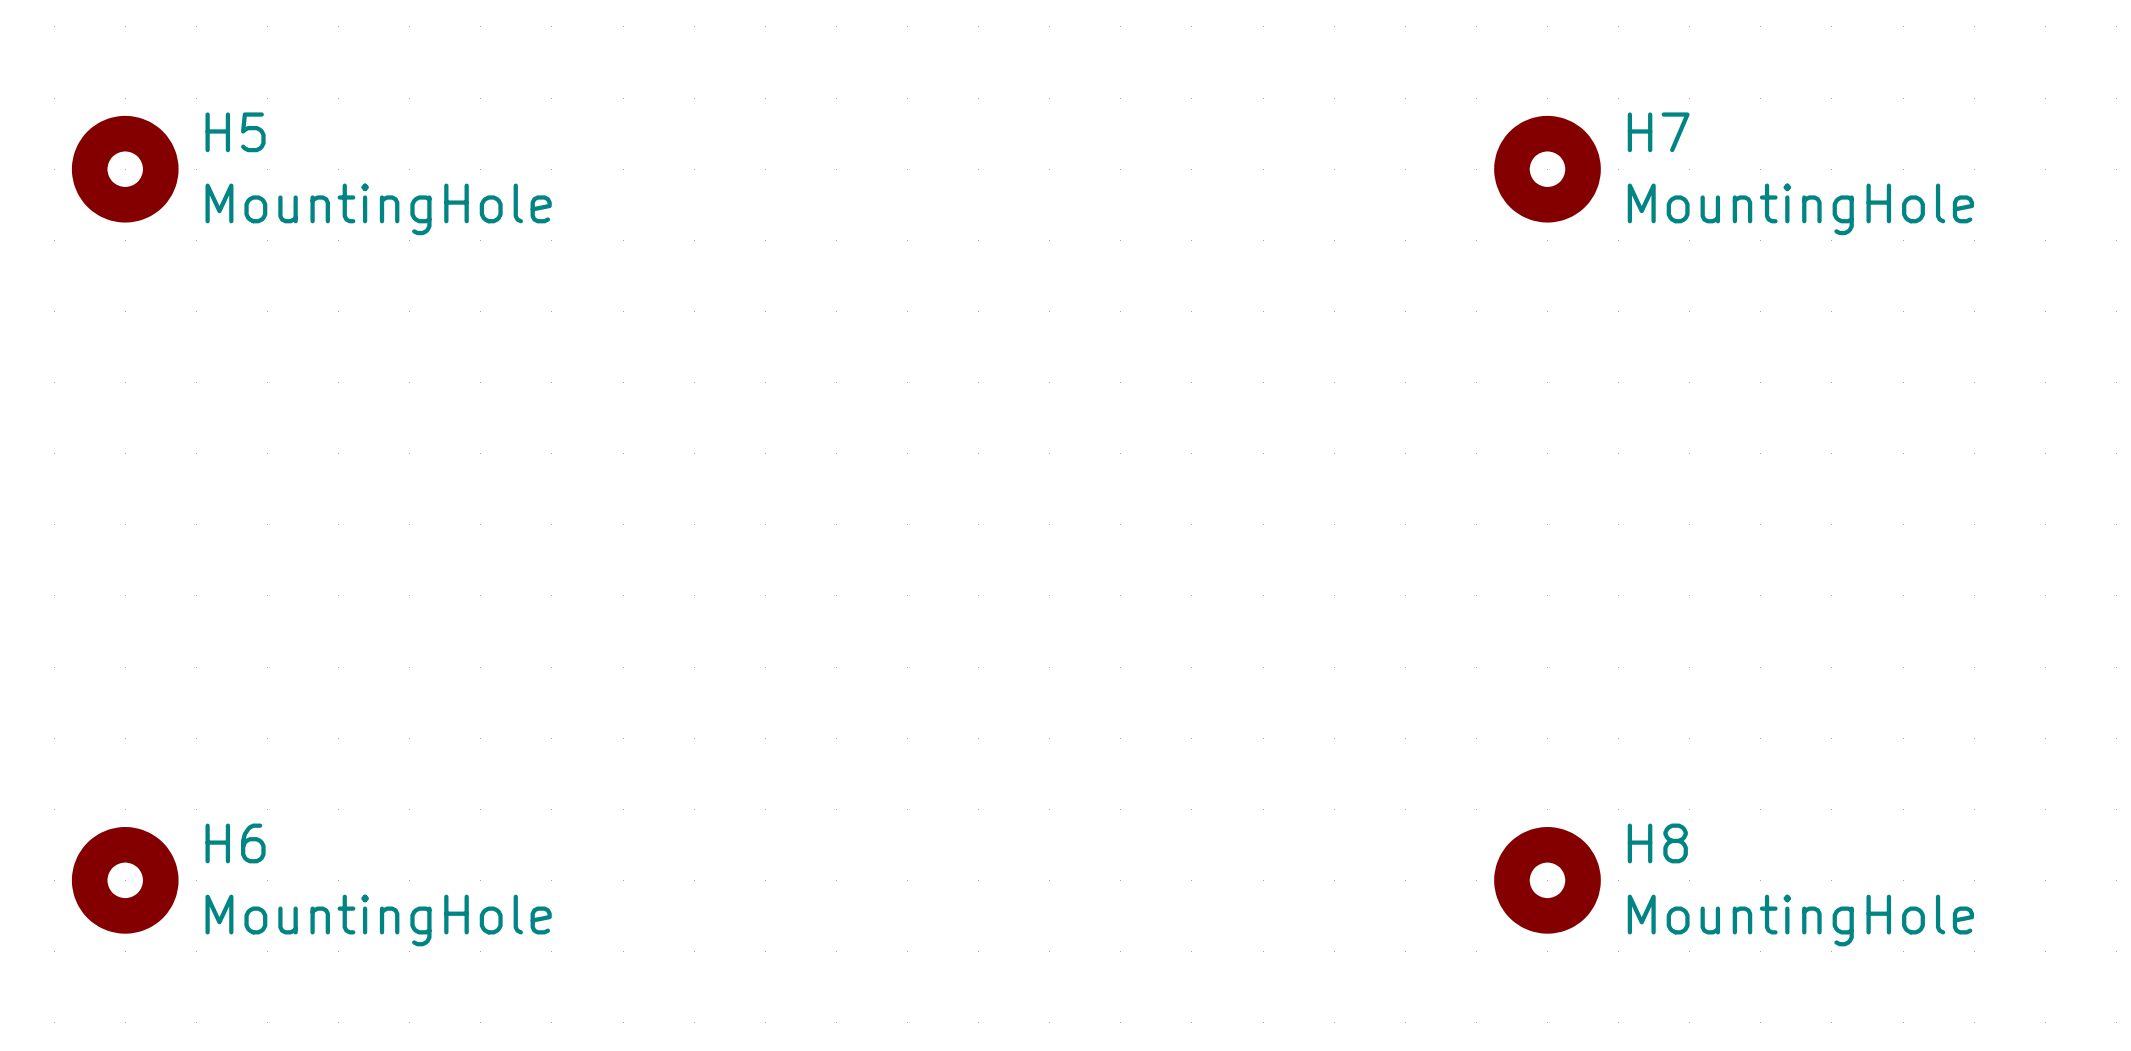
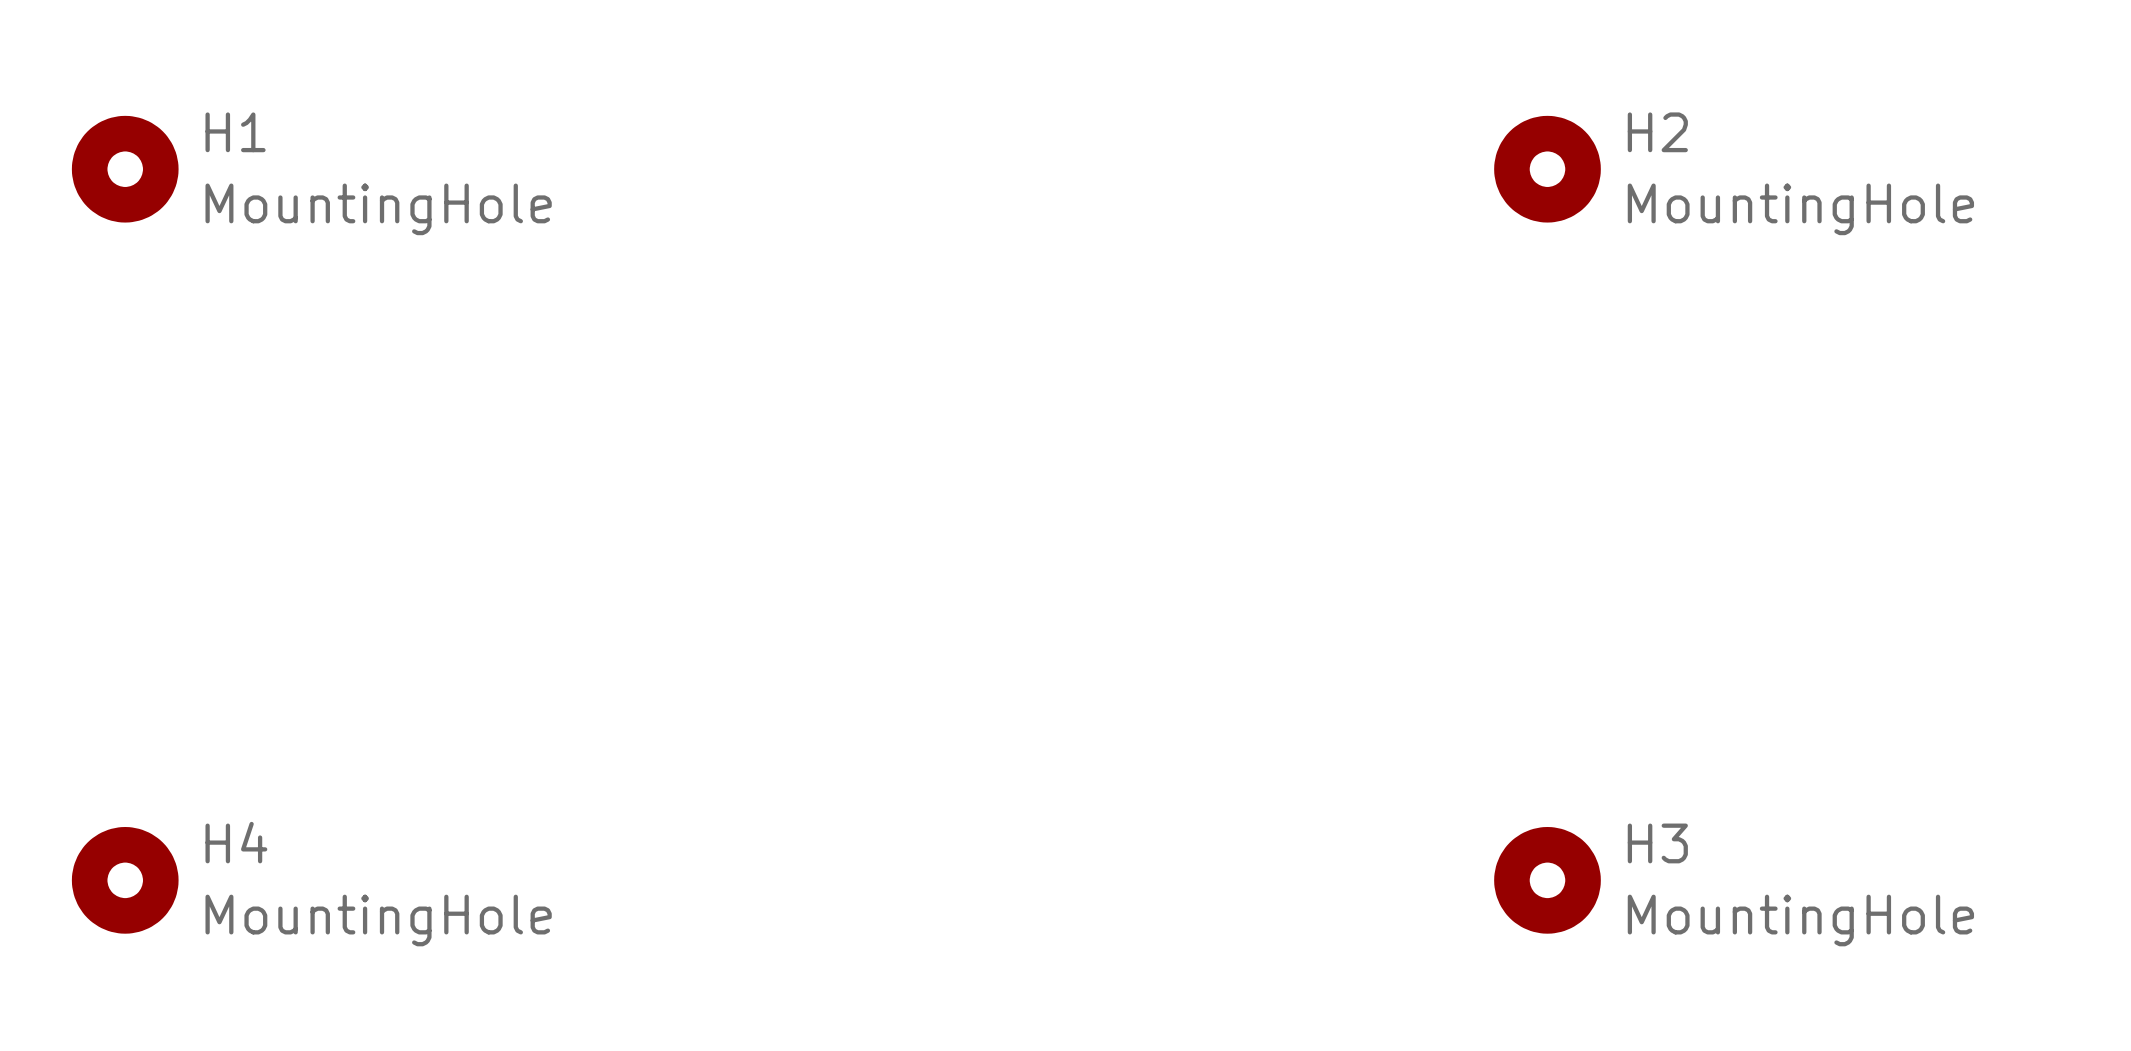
H5 name: H5 (235, 132) -> H1 (235, 132)
H7 name: H7 (1658, 132) -> H2 (1657, 132)
H6 name: H6 (235, 843) -> H4 (236, 842)
H8 name: H8 (1657, 843) -> H3 (1657, 843)

